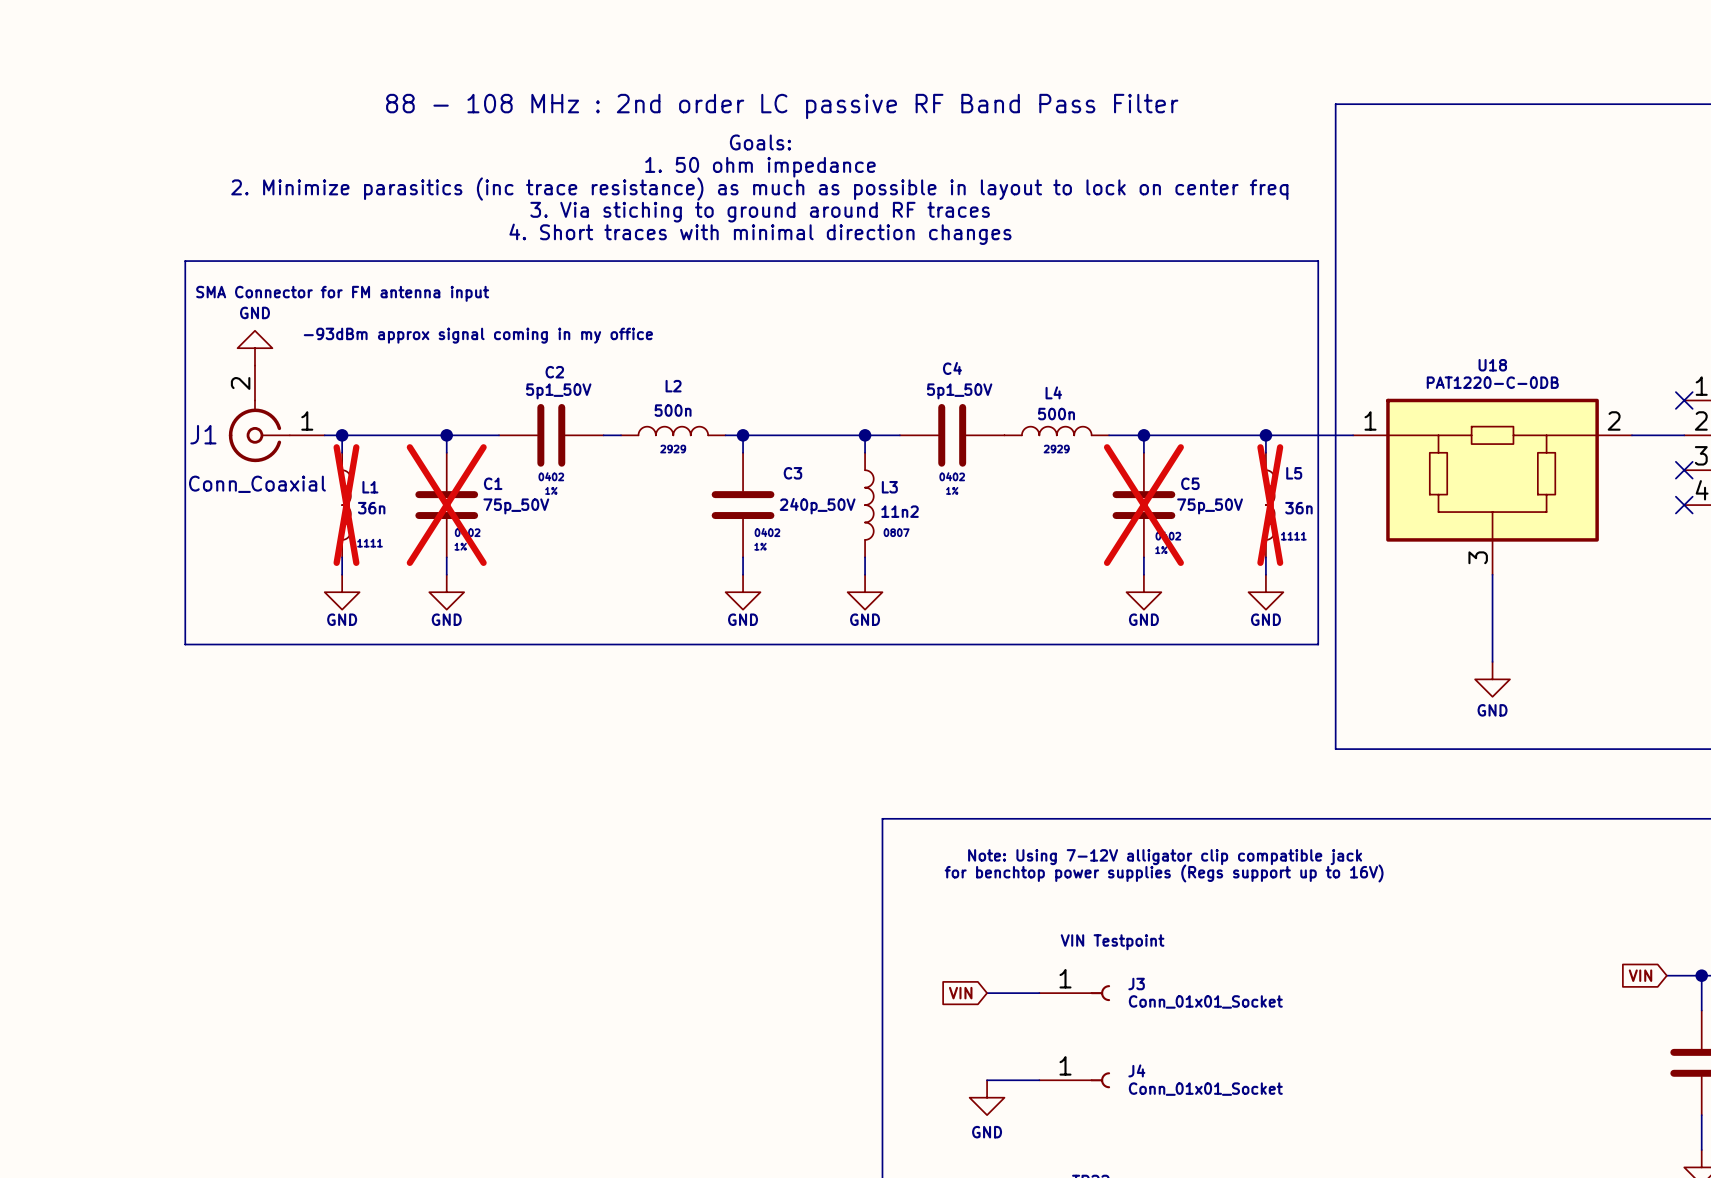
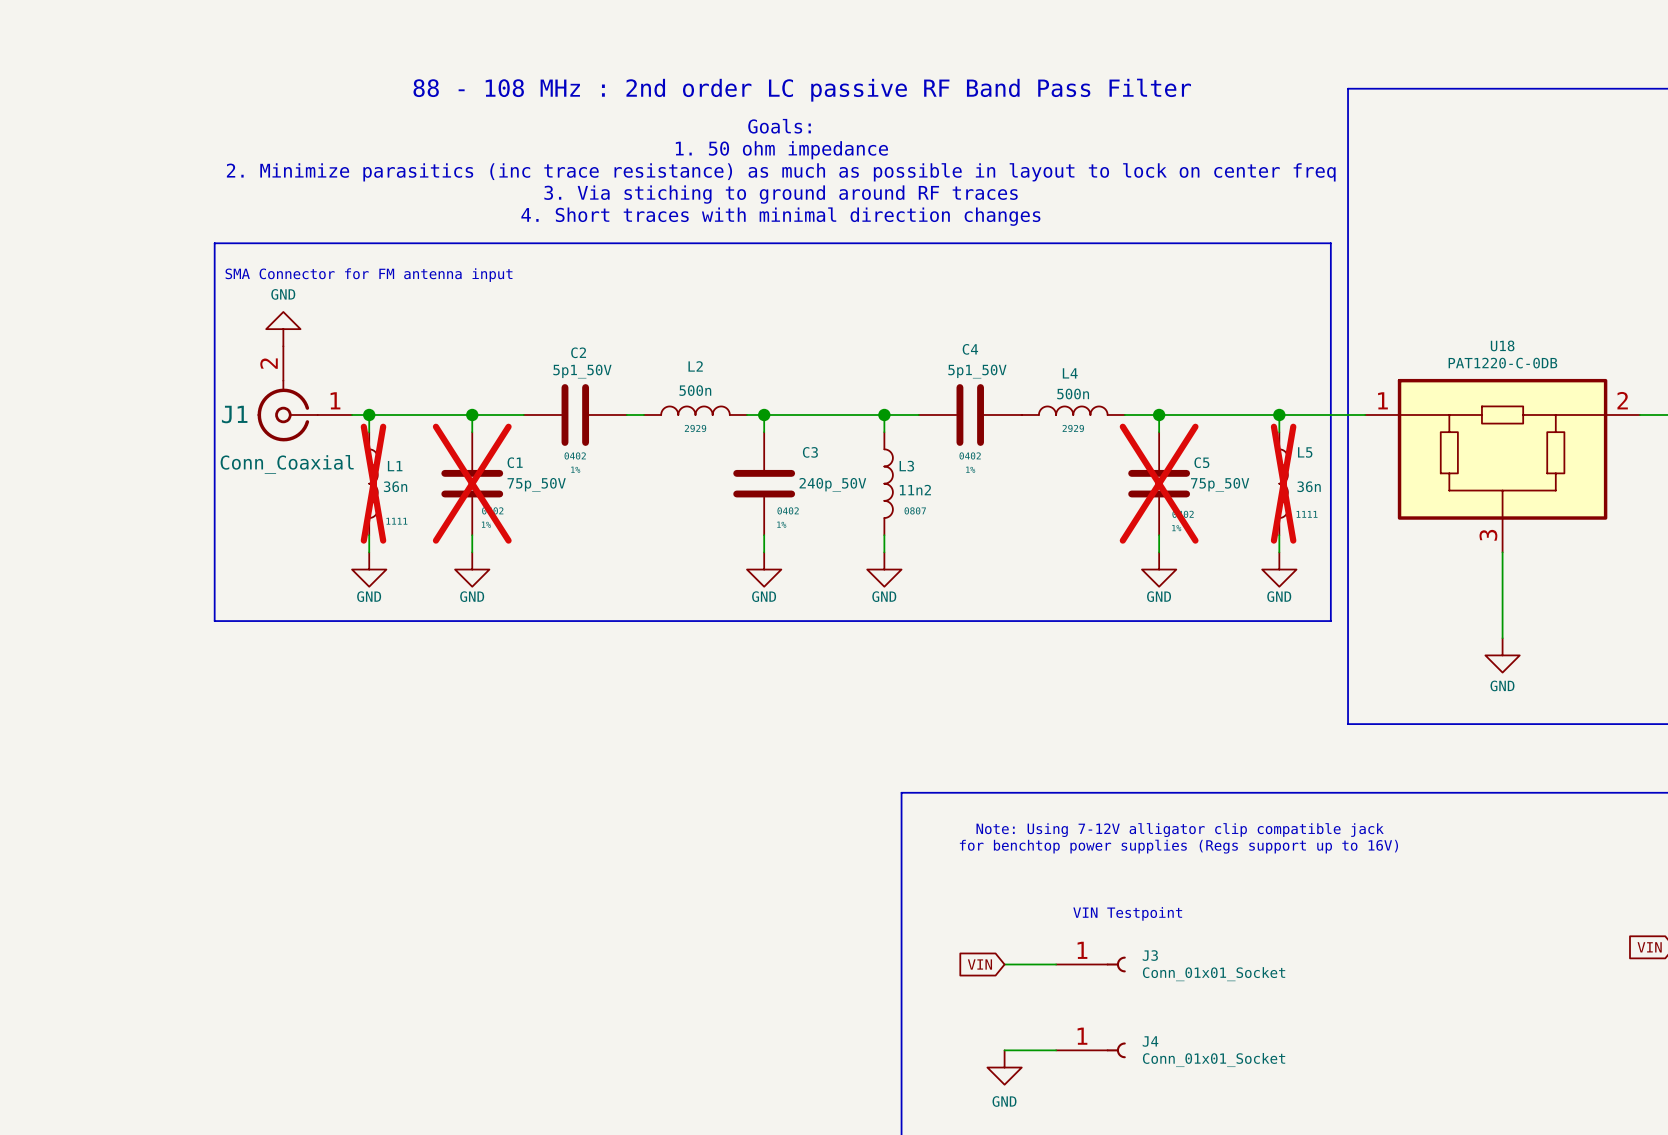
text: -93dBm approx signal coming in my office (478, 335) -> none

